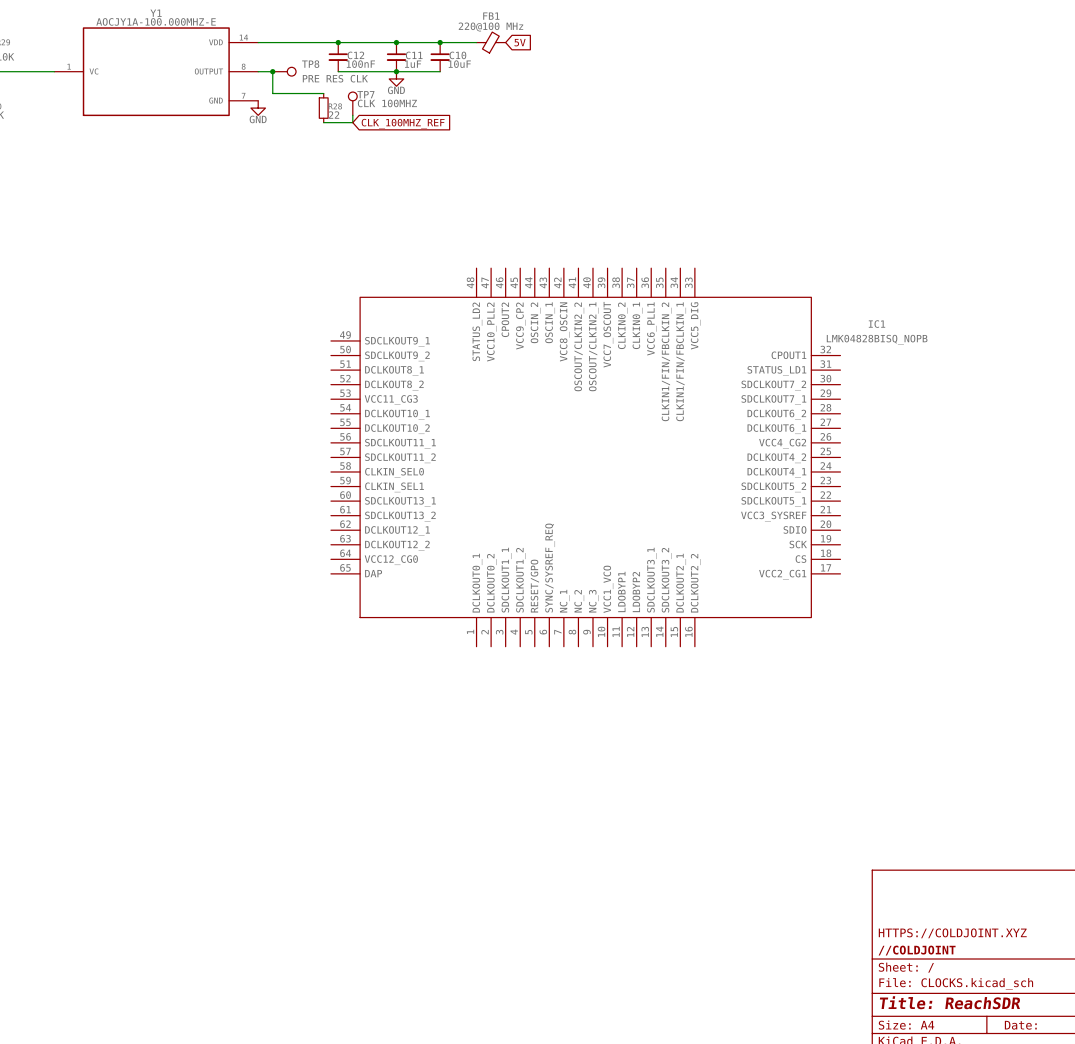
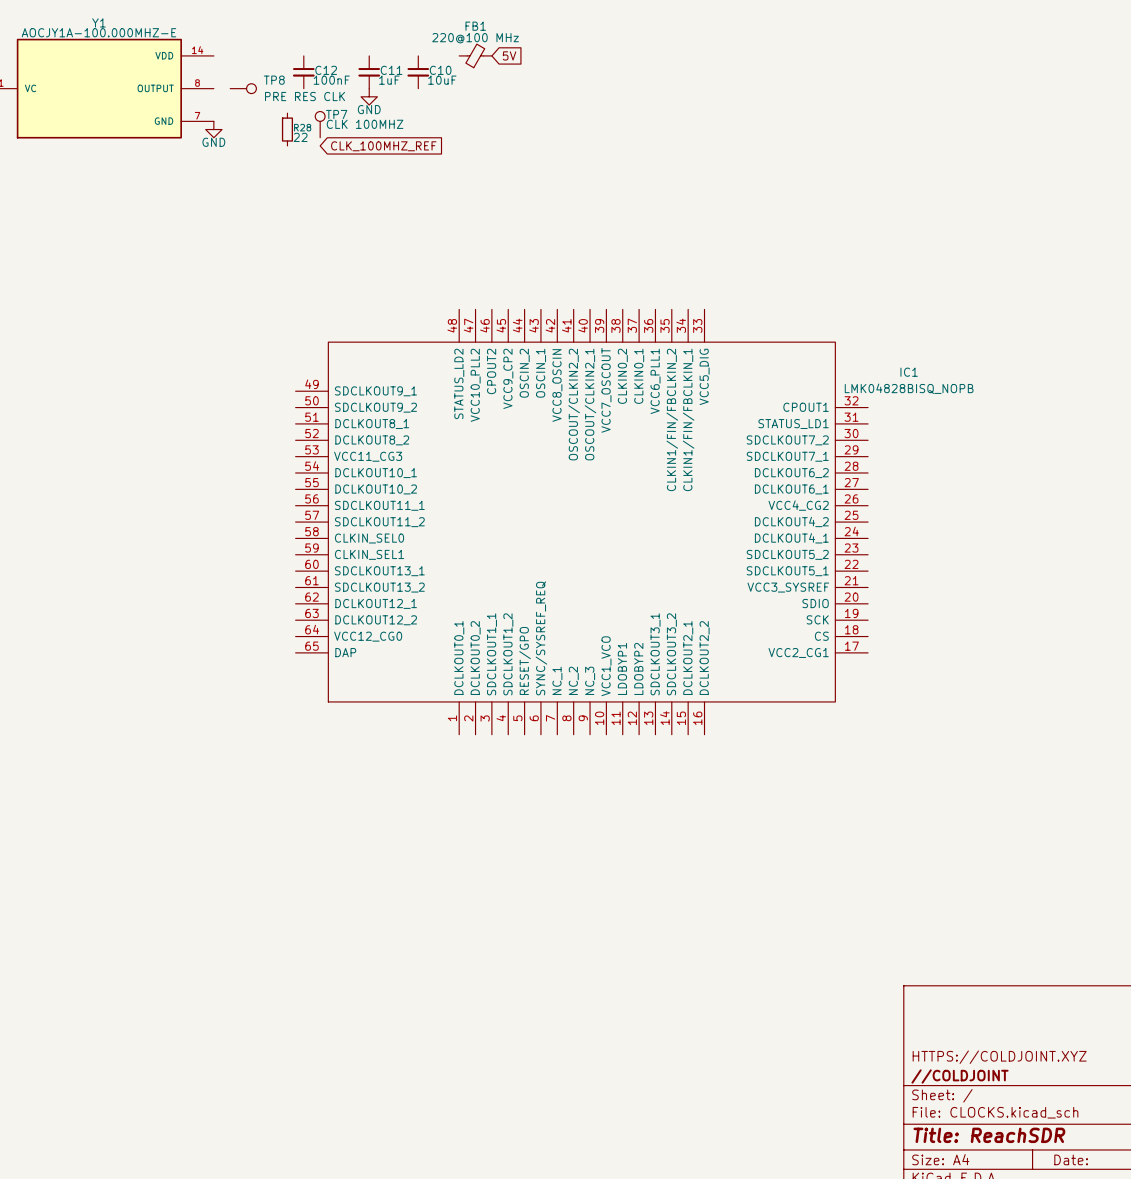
wire: (258, 42) (476, 42) -> none
junction: (338, 42) -> none
junction: (396, 42) -> none
junction: (440, 42) -> none
wire: (258, 71) (272, 71) (272, 93) (323, 93) -> none
junction: (272, 71) -> none
wire: (338, 71) (440, 71) -> none
junction: (396, 71) -> none
wire: (352, 115) (352, 122) (323, 122) -> none

